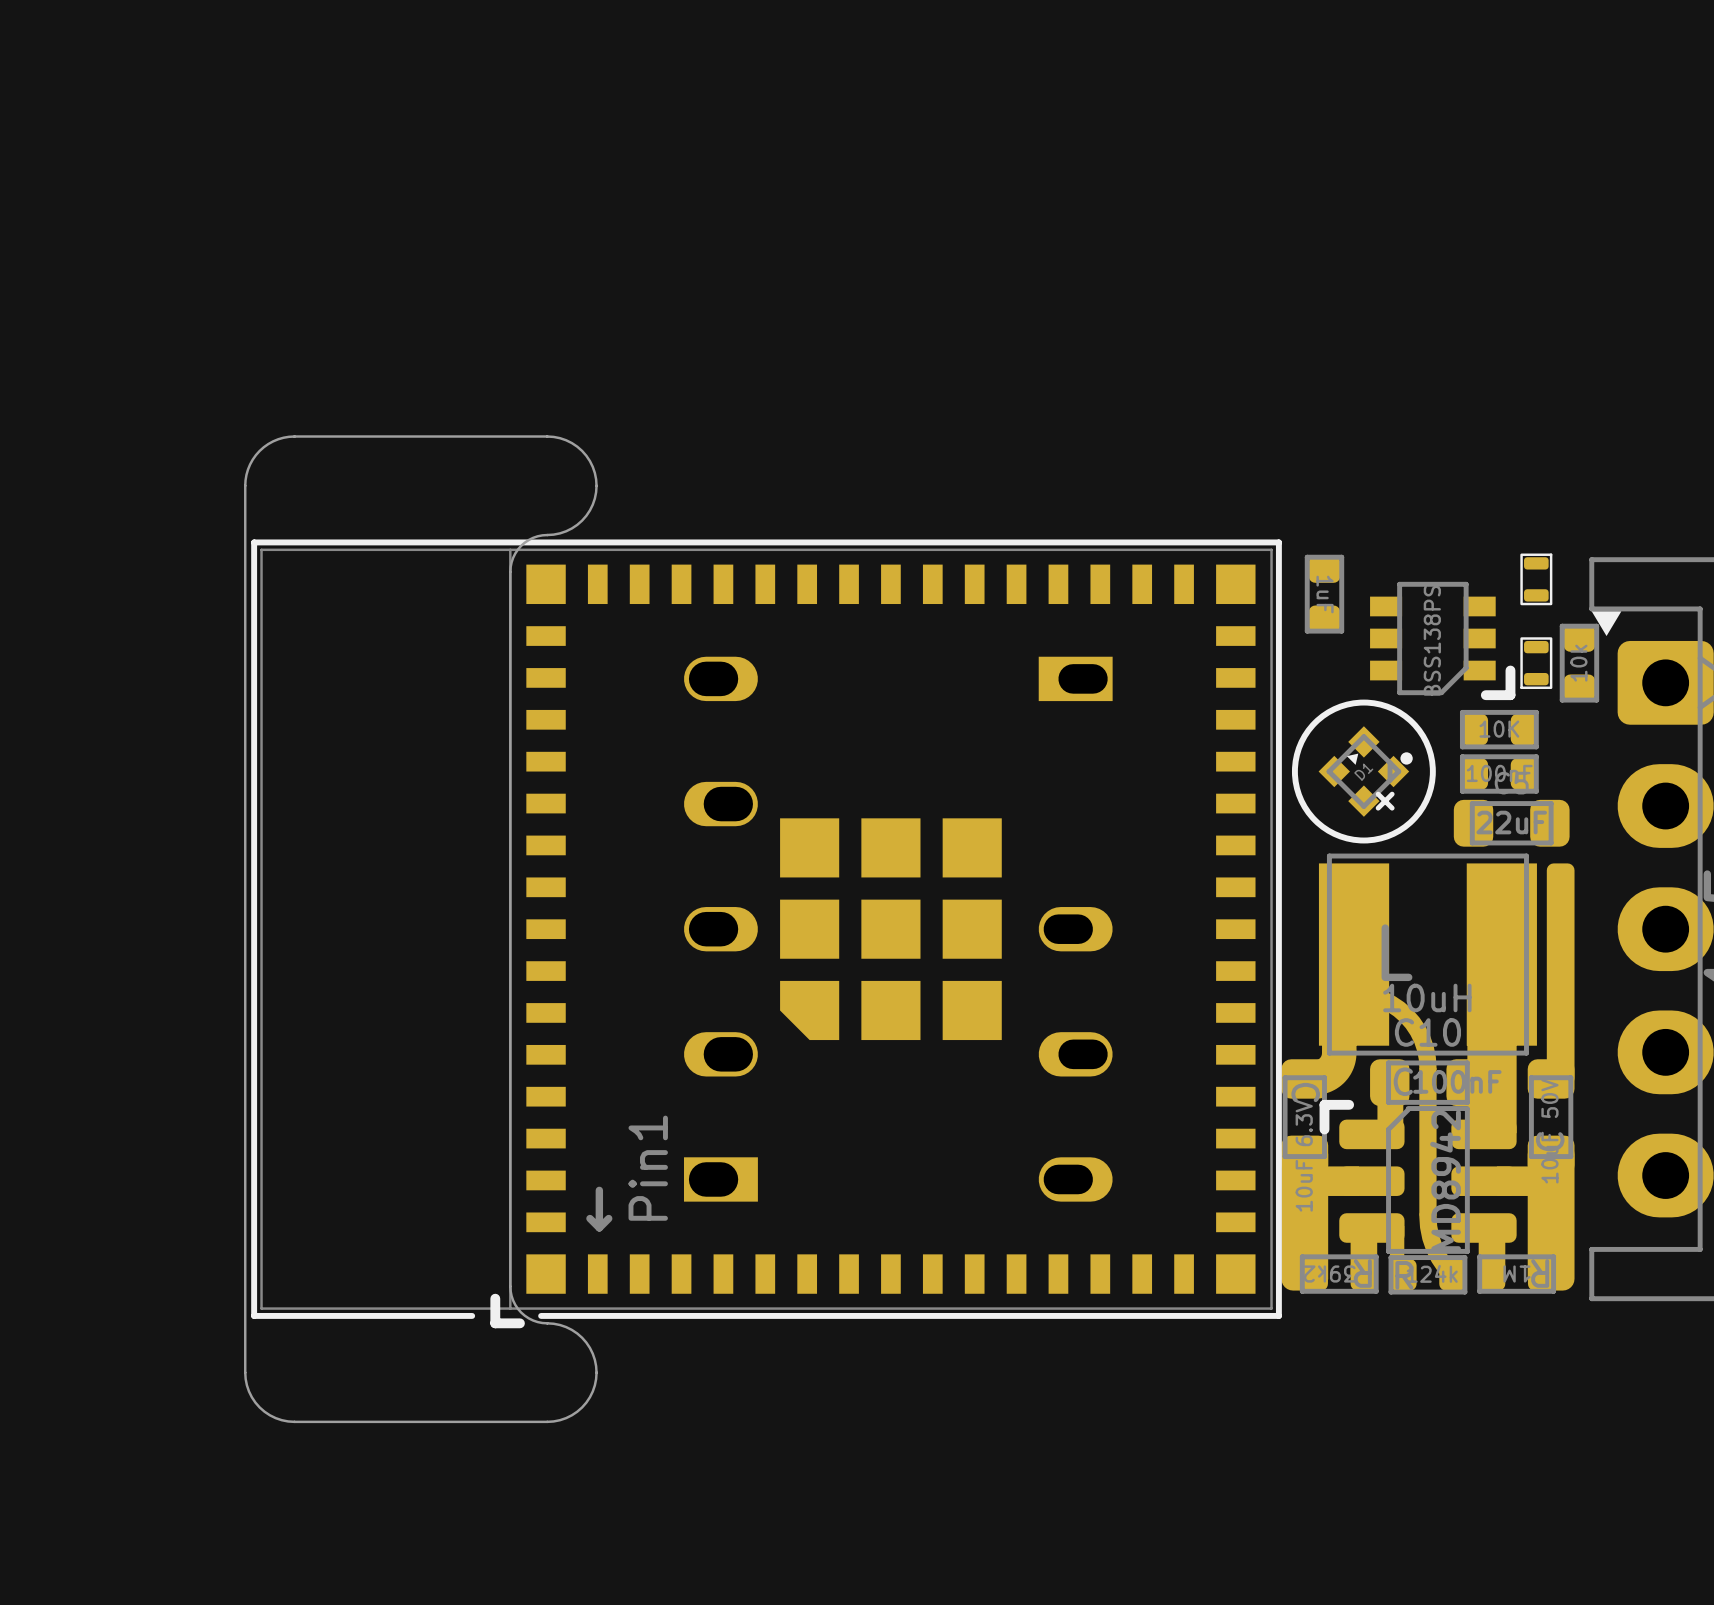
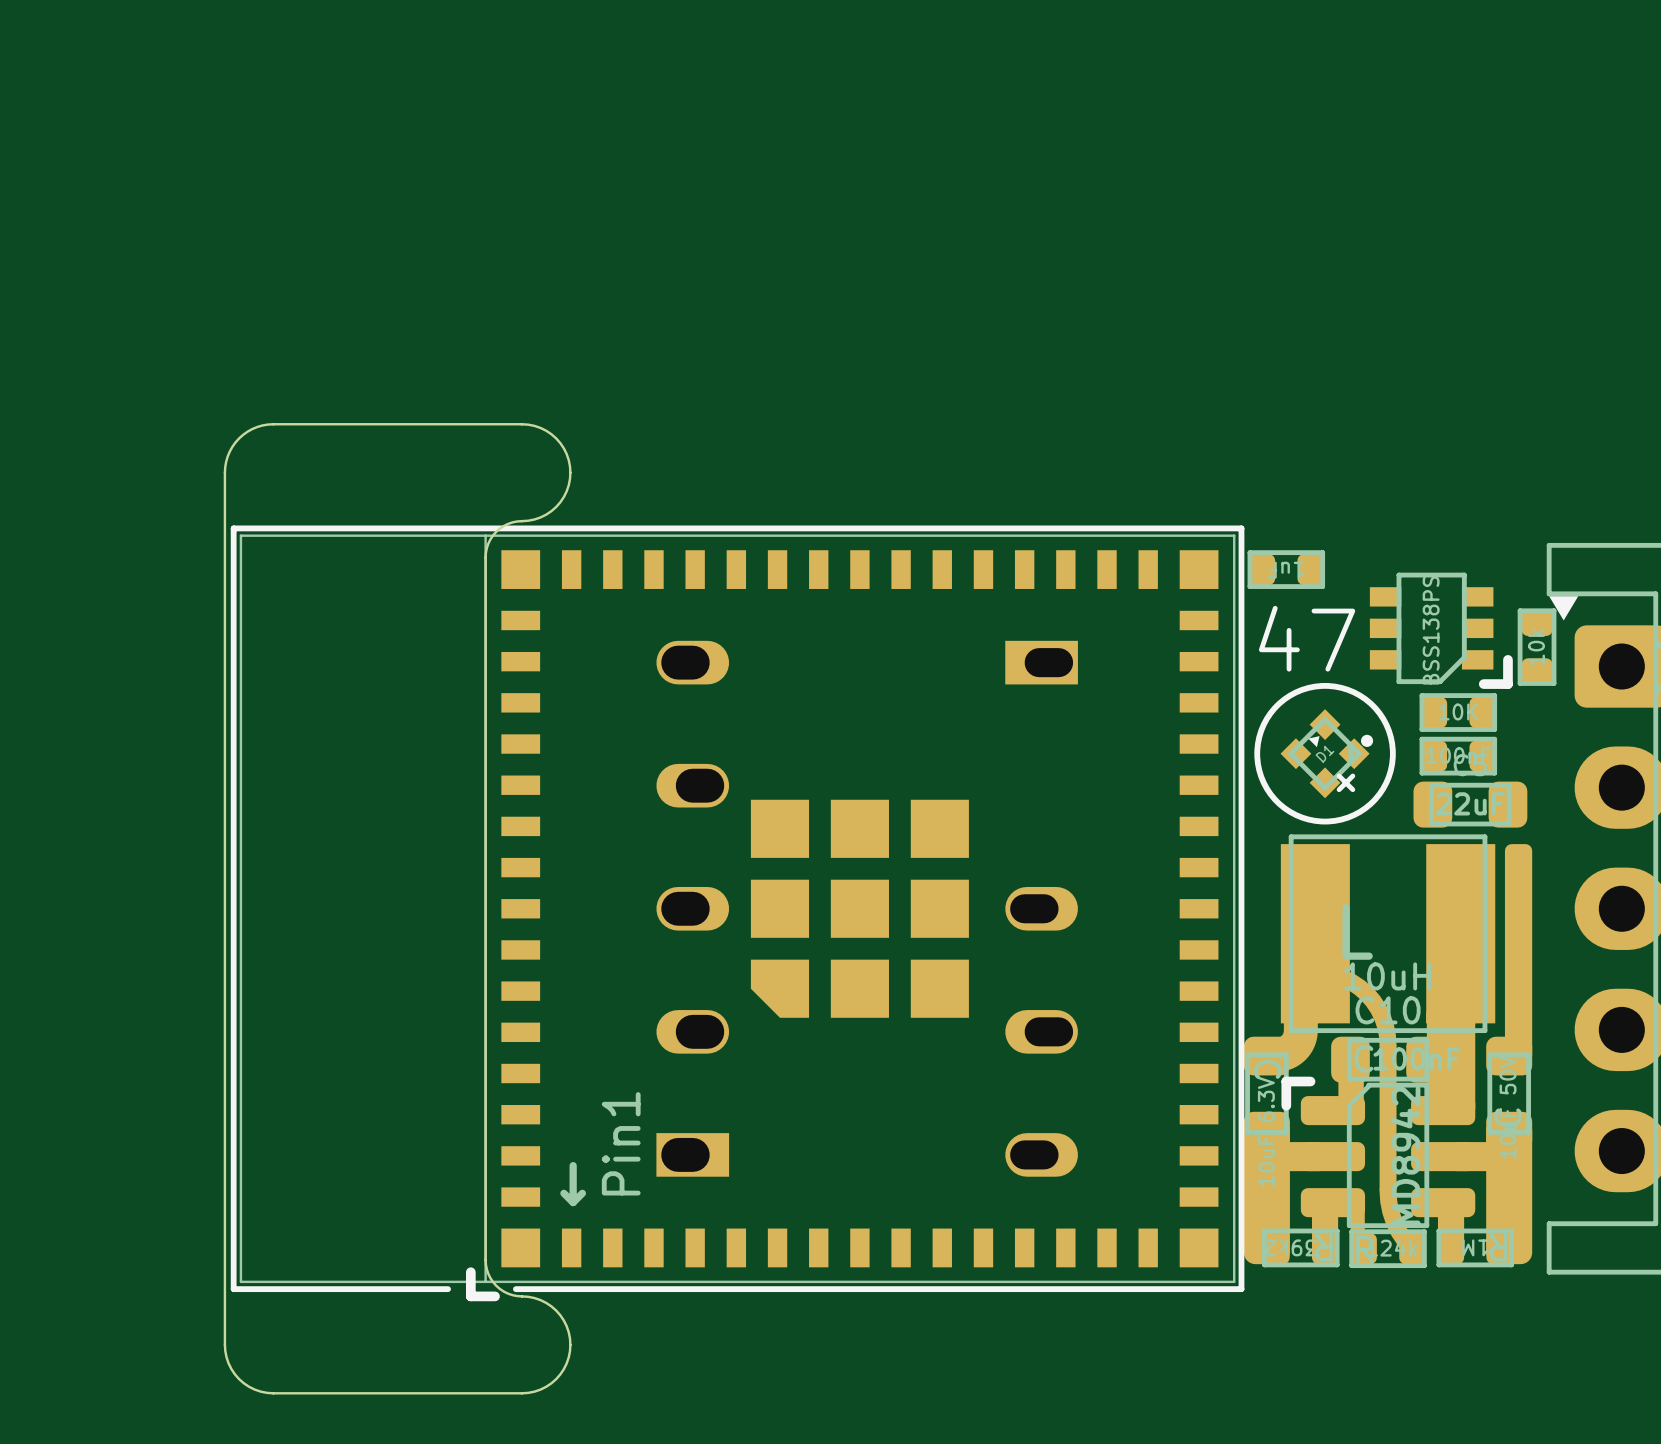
part: (1536, 579) -> none
part rotation: 0° (1324, 594) -> 90° clockwise (1286, 569)
part position: (1442, 640) -> (1441, 630)
text: none -> 47 (1307, 638)
part: (1536, 663) -> none

